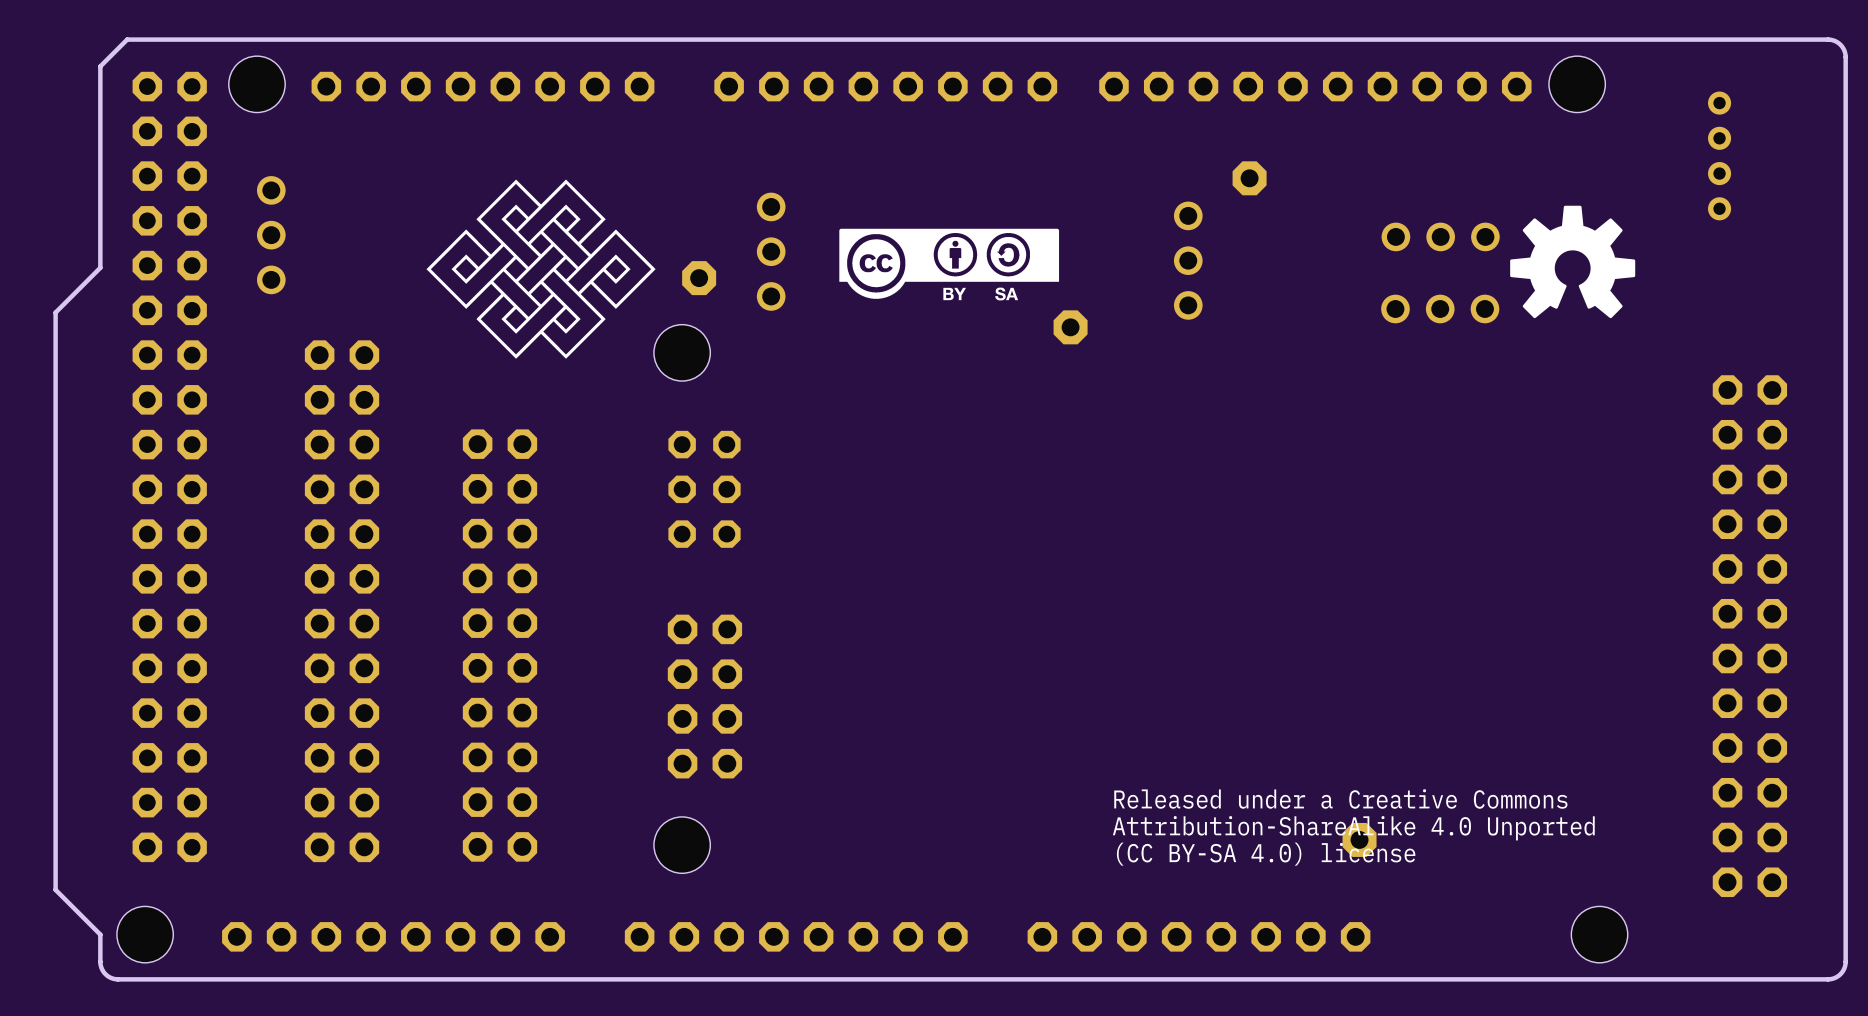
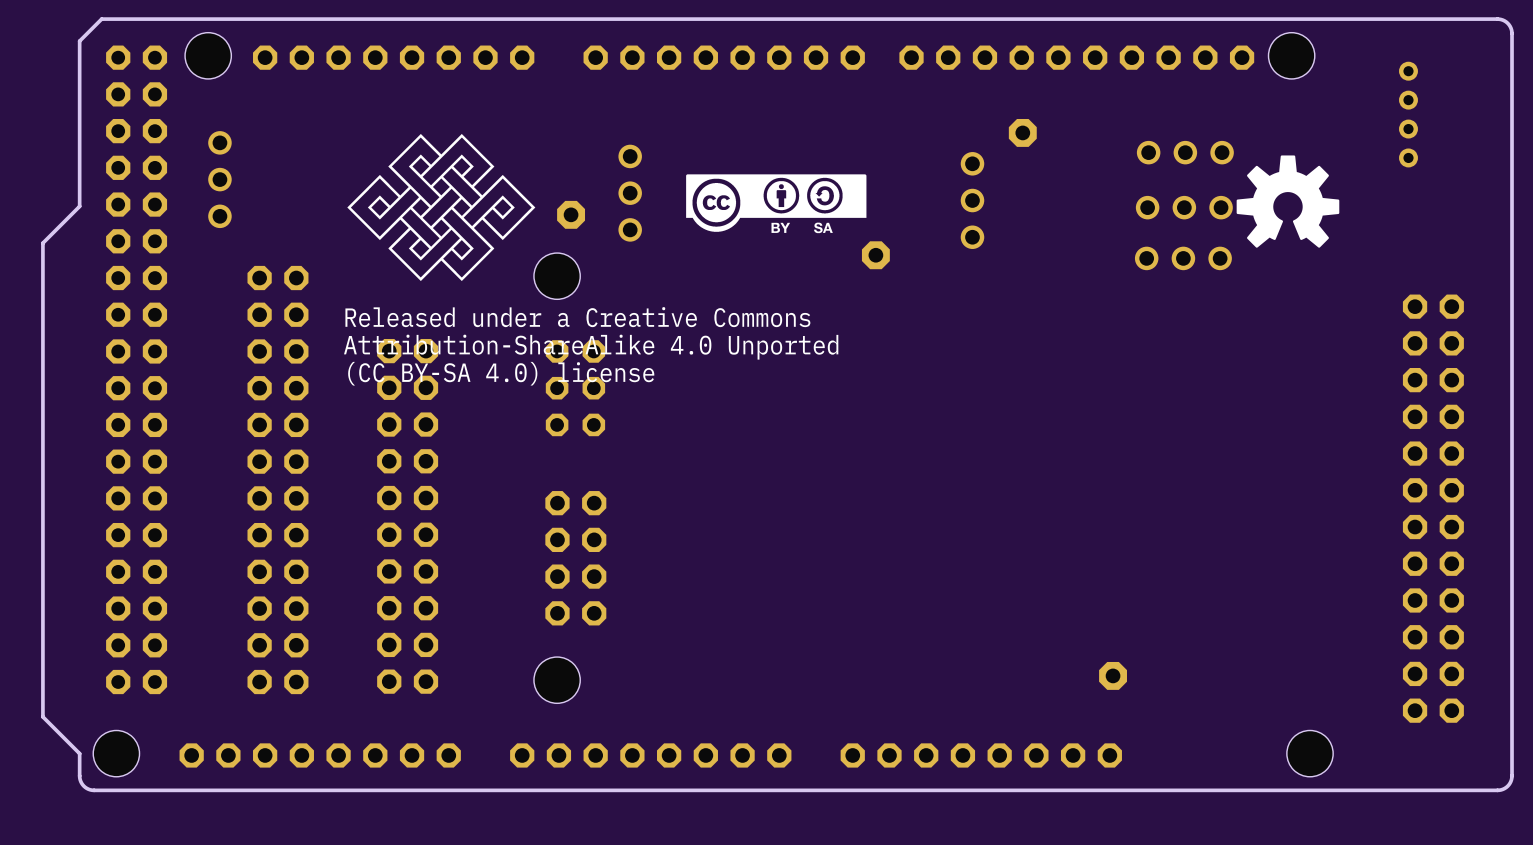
part: none -> (1185, 152)
part: (1440, 236) -> none
part: none -> (1184, 207)
part: (1440, 308) -> none
part: none -> (1183, 258)
text: none -> Released under a Creative Commons (577, 317)
text: none -> Attribution-ShareAlike 4.0 Unported (591, 347)
text: none -> (CC BY-SA 4.0) license (501, 373)
text: Released under a Creative Commons (1340, 798) -> none
text: Attribution-ShareAlike 4.0 Unported (1353, 828) -> none
text: (CC BY-SA 4.0) license (1266, 854) -> none

